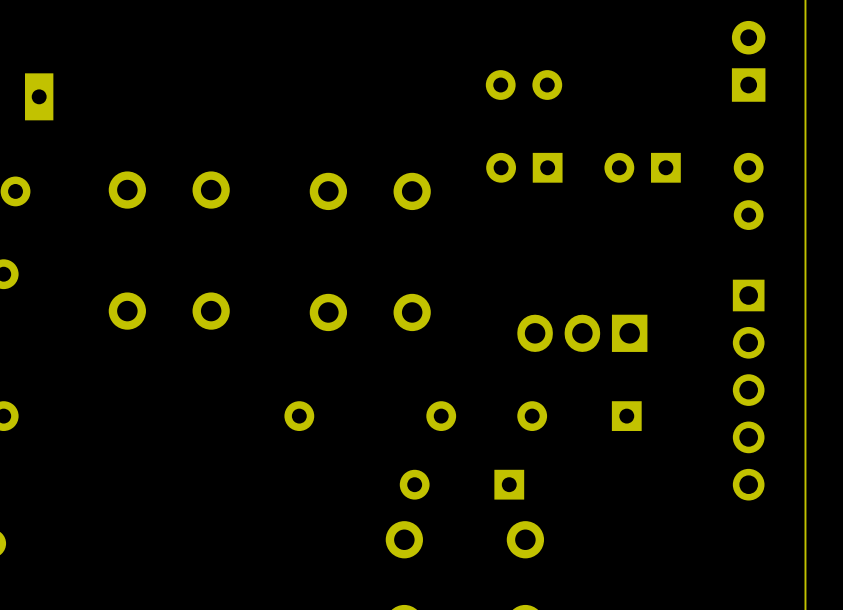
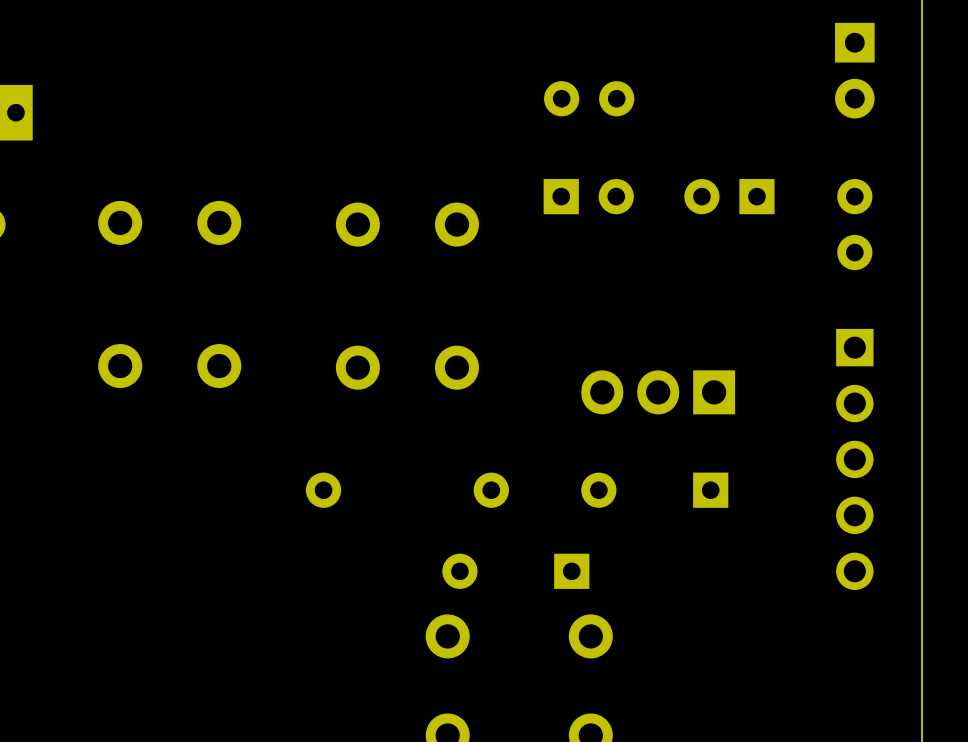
part rotation: 0° (748, 61) -> 180° (854, 70)
part rotation: 0° (524, 167) -> 180° (588, 196)

